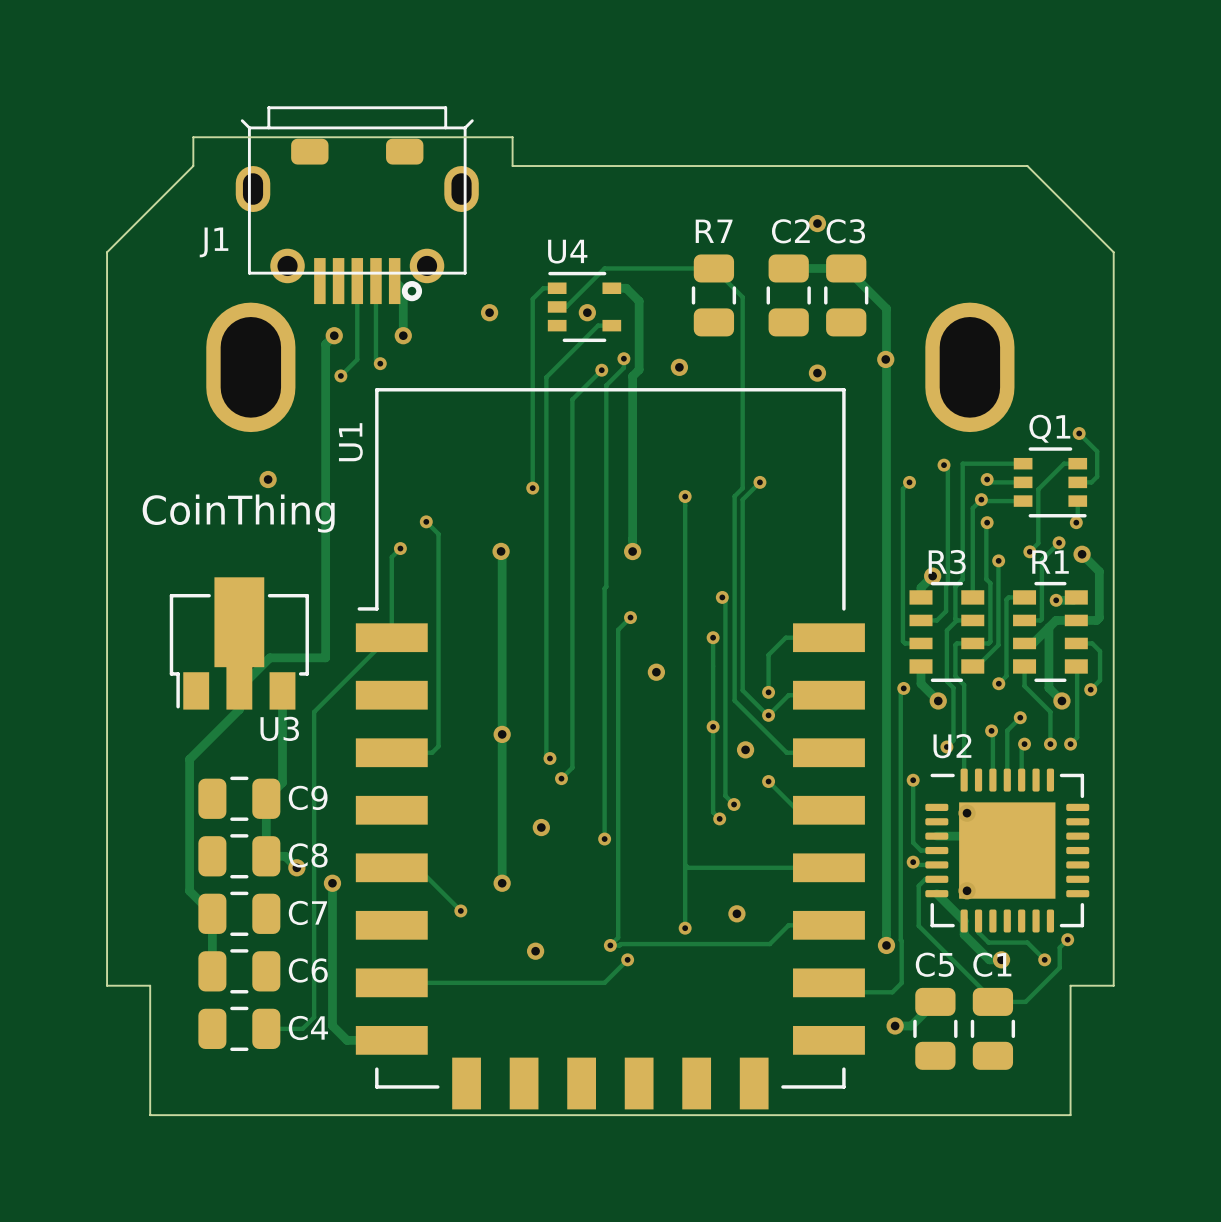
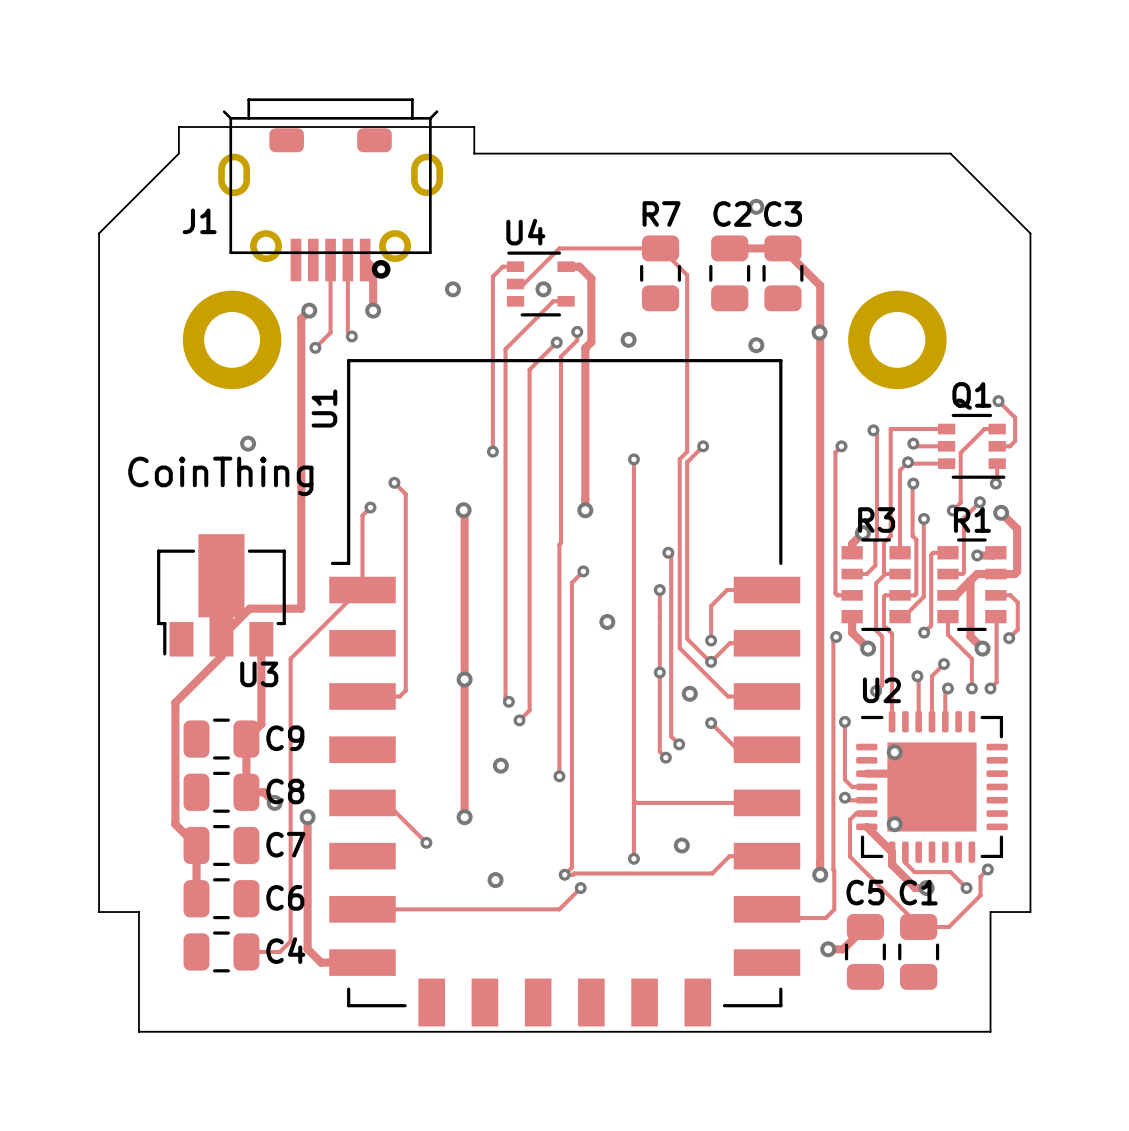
part footprint: [206, 302, 296, 433] -> [182, 290, 282, 390]
part footprint: [925, 302, 1015, 433] -> [848, 290, 947, 390]

